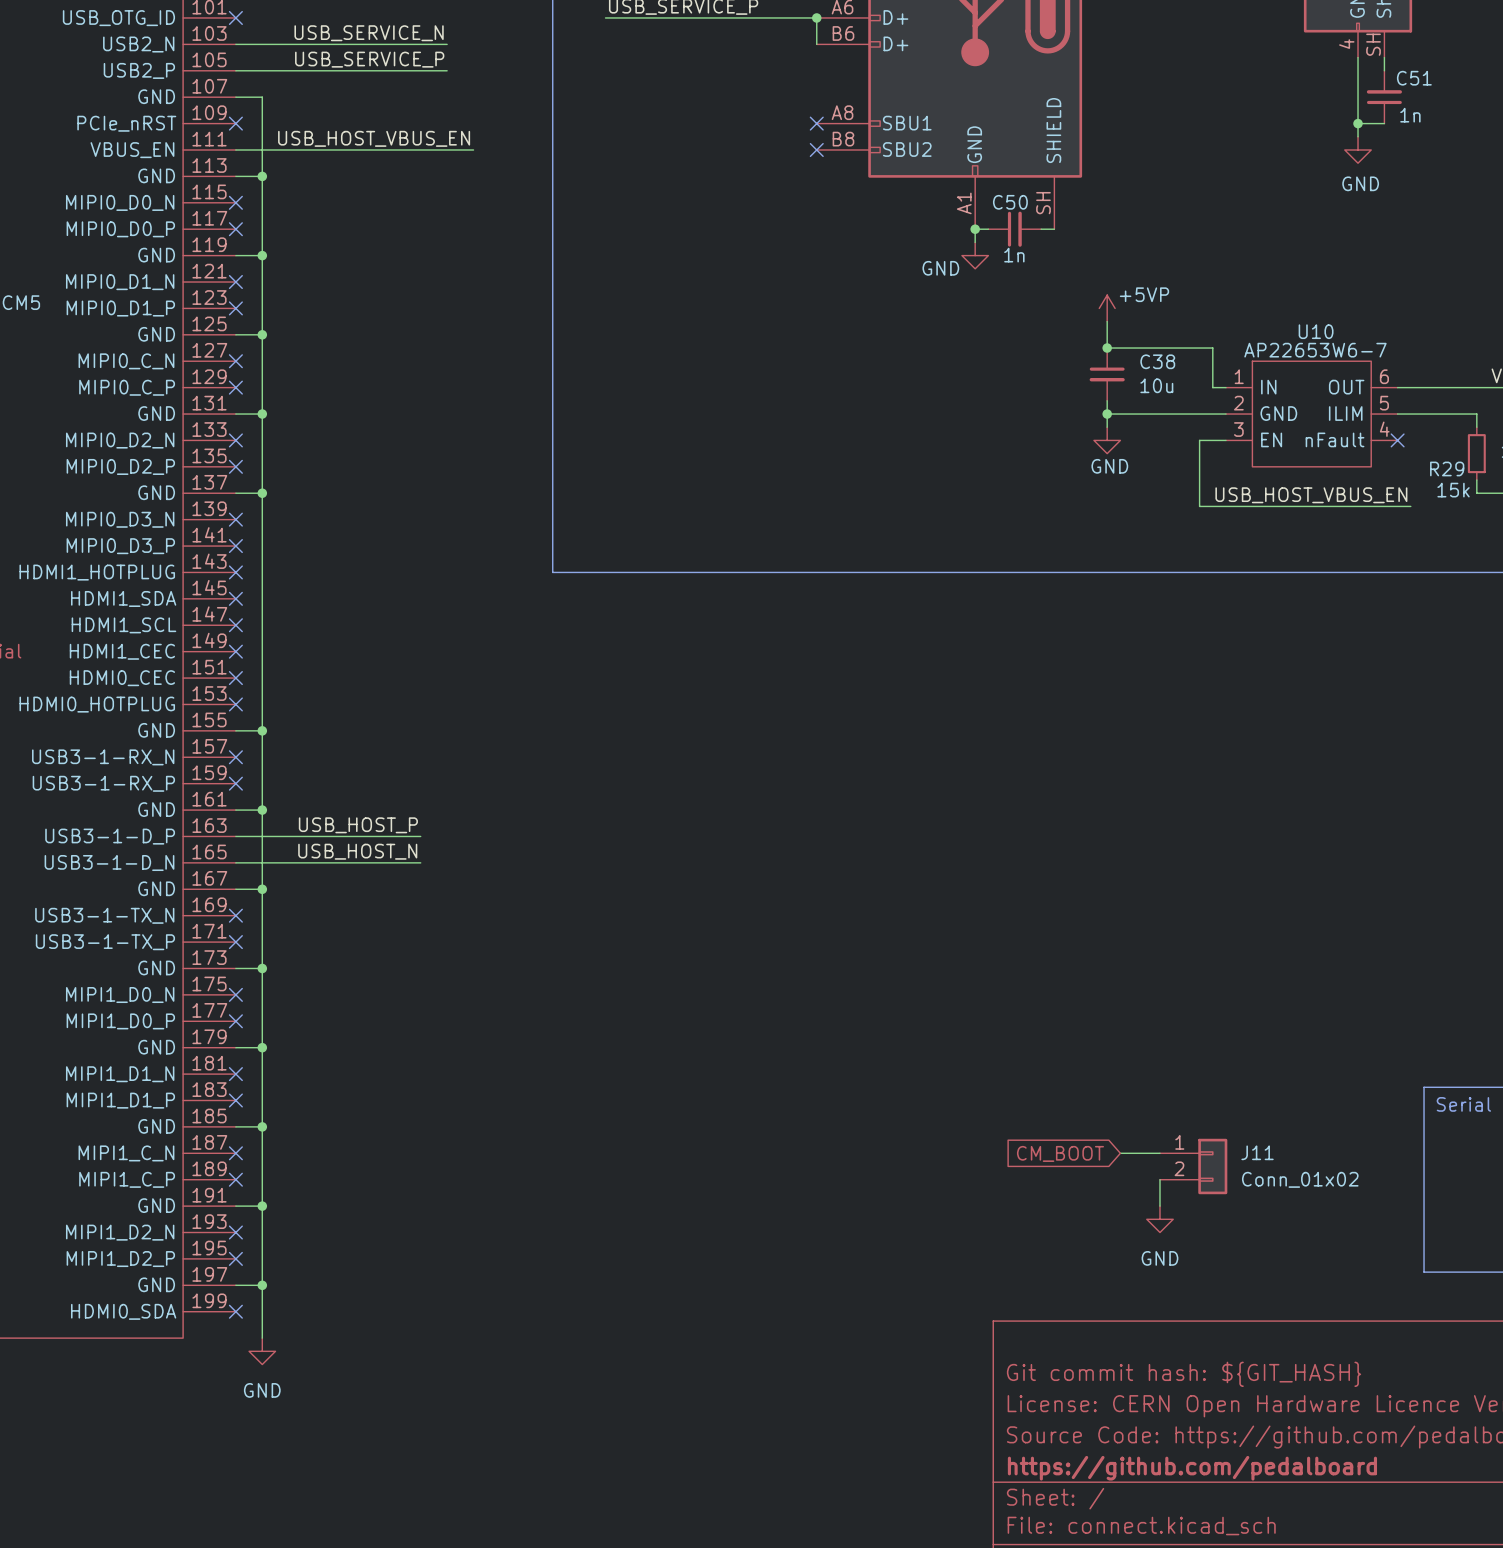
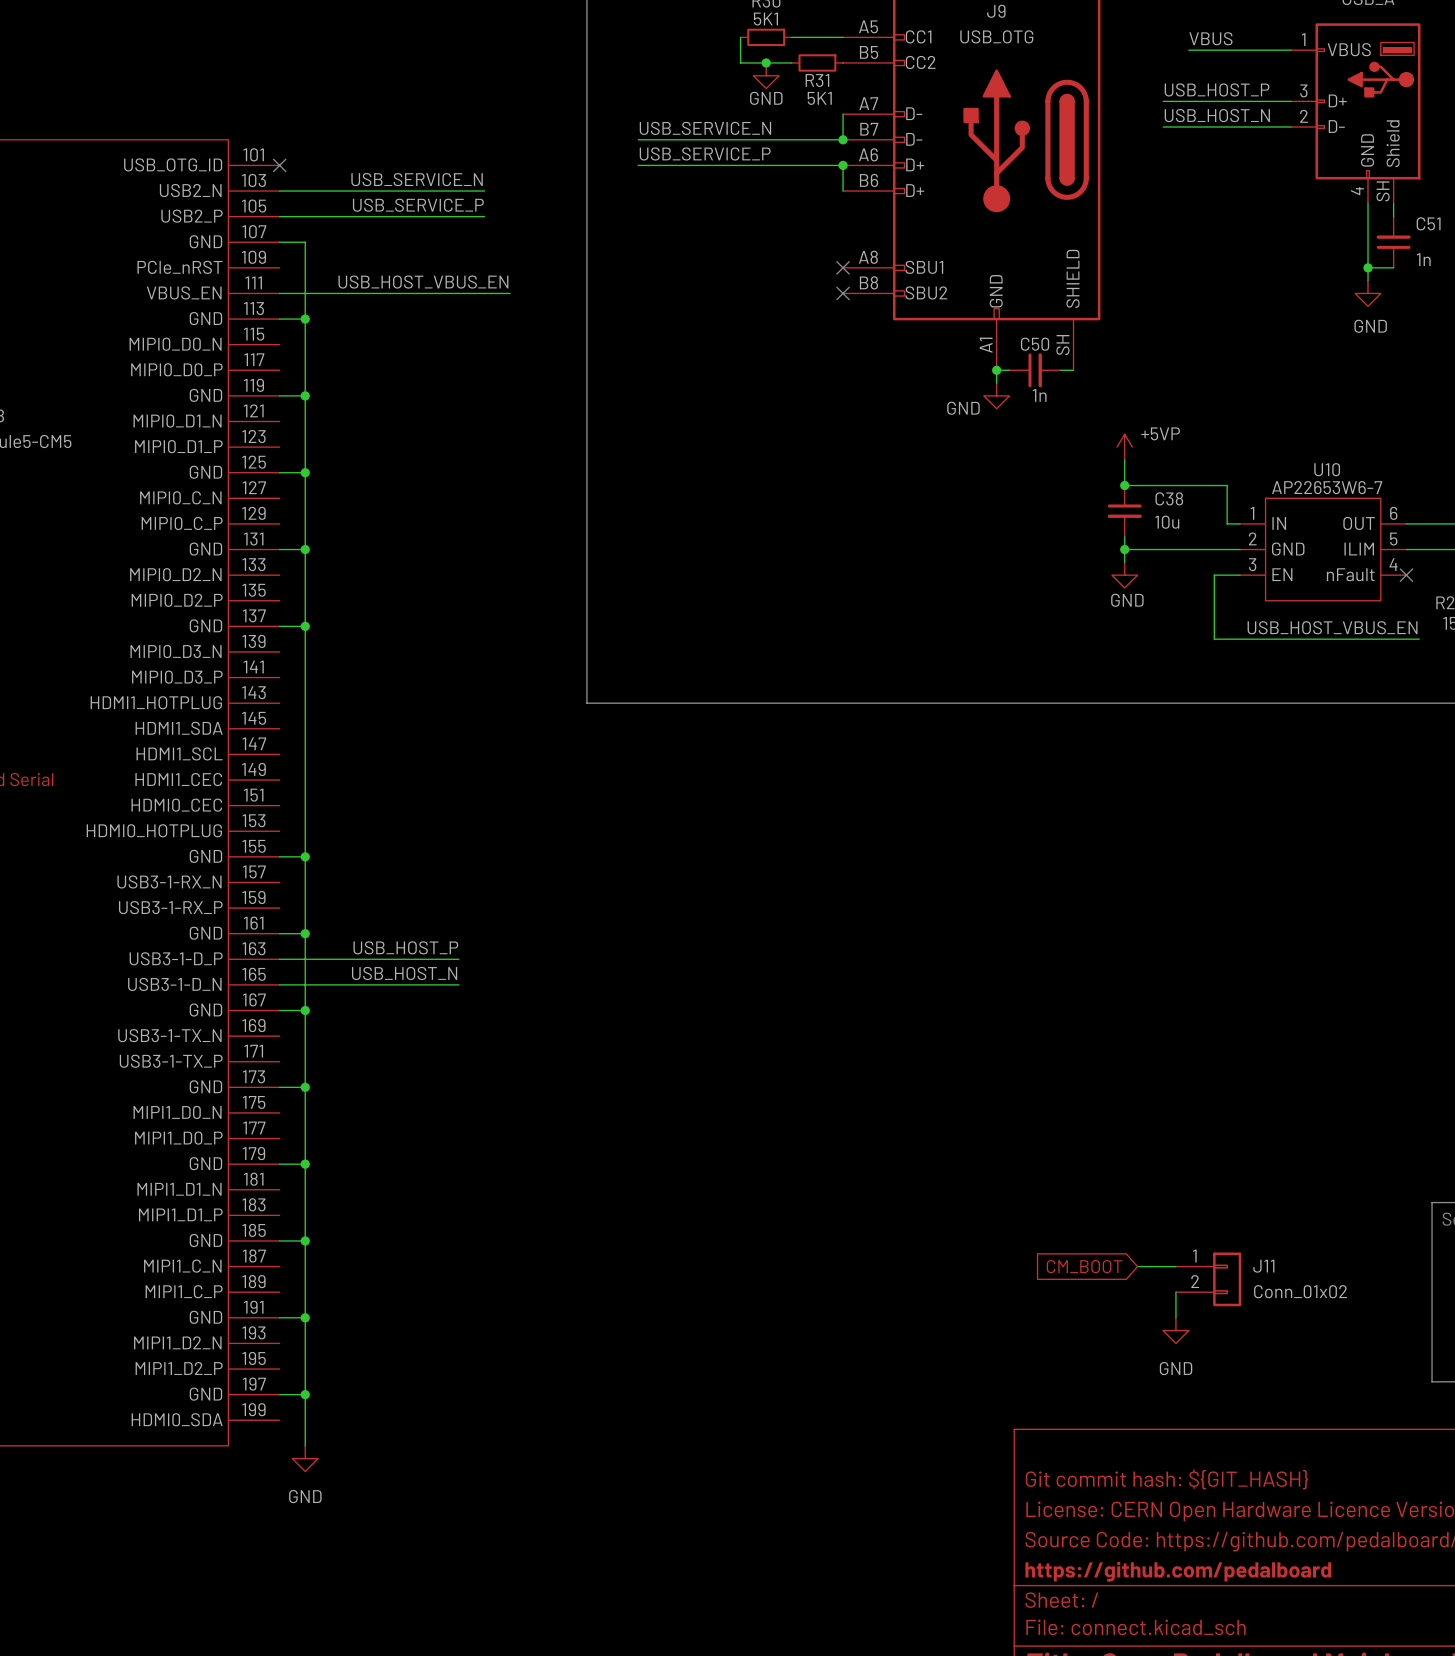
no-connect mark: (235, 123) -> none
no-connect mark: (235, 202) -> none
no-connect mark: (235, 229) -> none
no-connect mark: (235, 282) -> none
no-connect mark: (235, 308) -> none
no-connect mark: (235, 361) -> none
no-connect mark: (235, 387) -> none
no-connect mark: (235, 440) -> none
no-connect mark: (235, 466) -> none
no-connect mark: (235, 519) -> none
no-connect mark: (235, 546) -> none
no-connect mark: (235, 572) -> none
no-connect mark: (235, 598) -> none
no-connect mark: (235, 625) -> none
no-connect mark: (235, 651) -> none
no-connect mark: (235, 678) -> none
no-connect mark: (235, 704) -> none
no-connect mark: (235, 757) -> none
no-connect mark: (235, 783) -> none
no-connect mark: (235, 915) -> none
no-connect mark: (235, 942) -> none
no-connect mark: (235, 994) -> none
no-connect mark: (235, 1021) -> none
no-connect mark: (235, 1074) -> none
no-connect mark: (235, 1100) -> none
no-connect mark: (235, 1153) -> none
no-connect mark: (235, 1179) -> none
no-connect mark: (235, 1232) -> none
no-connect mark: (235, 1258) -> none
no-connect mark: (235, 1311) -> none

